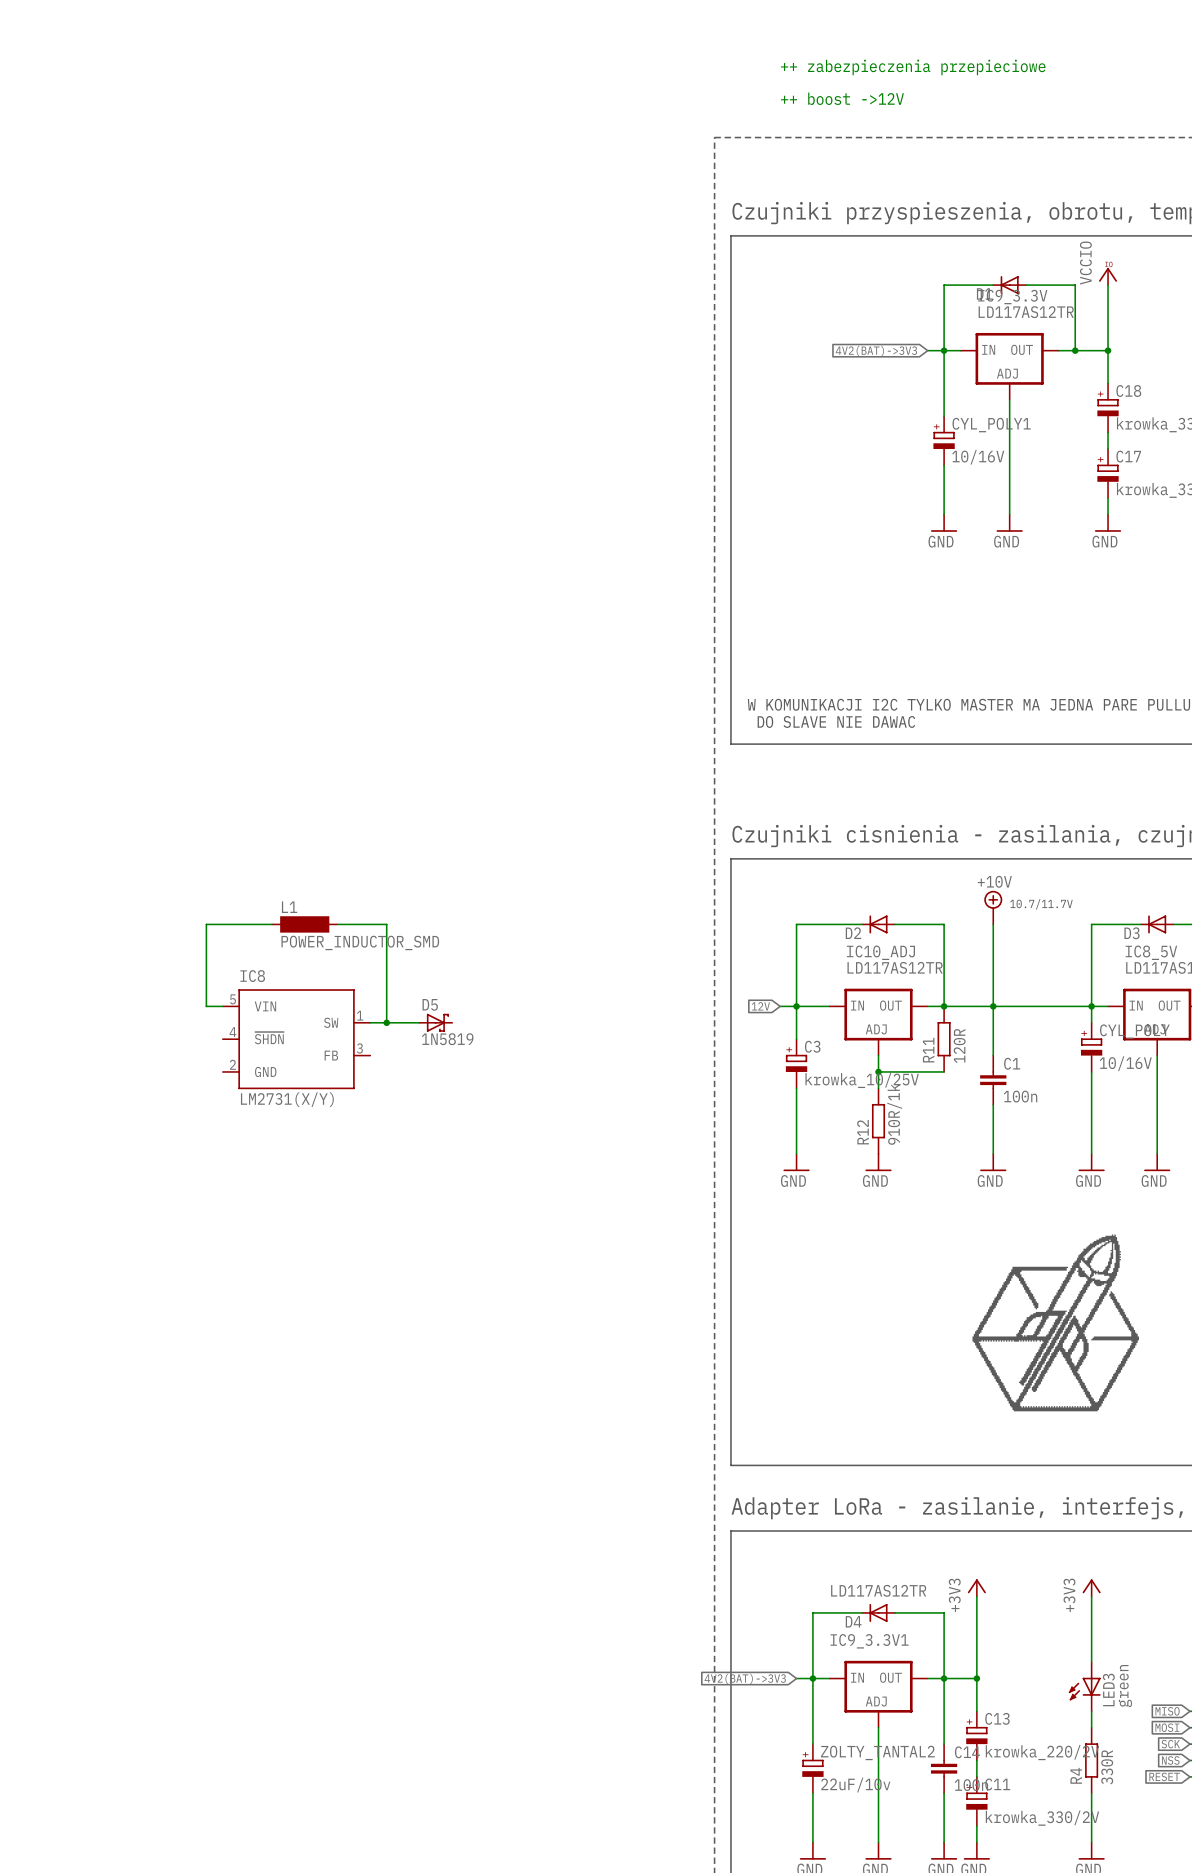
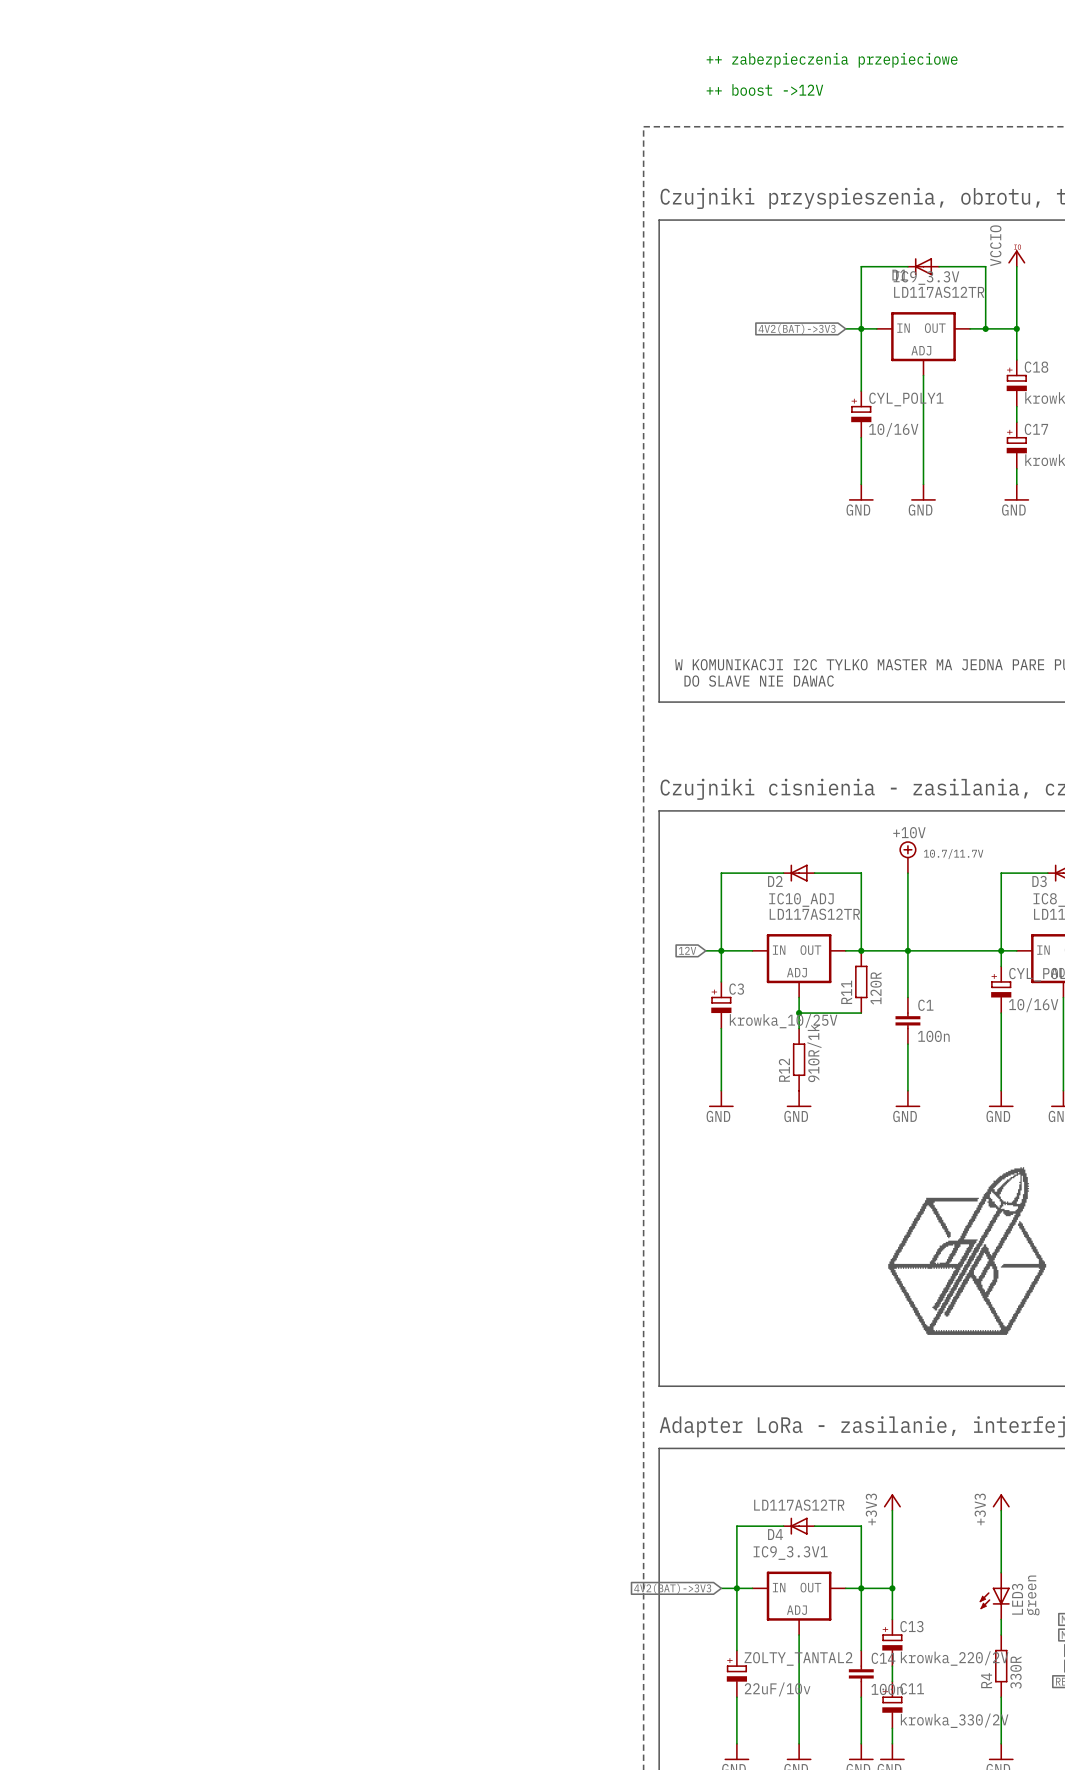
wire: (271, 924) (206, 924) (206, 1006) (222, 1006) -> none
L1: POWER_INDUCTOR_SMD (304, 924) -> none
wire: (337, 924) (386, 924) (386, 1022) -> none
wire: (370, 1022) (419, 1022) -> none
junction: (386, 1022) -> none
D5: 1N5819 (435, 1022) -> none
IC8: LM2731(X/Y) (296, 1039) -> none

